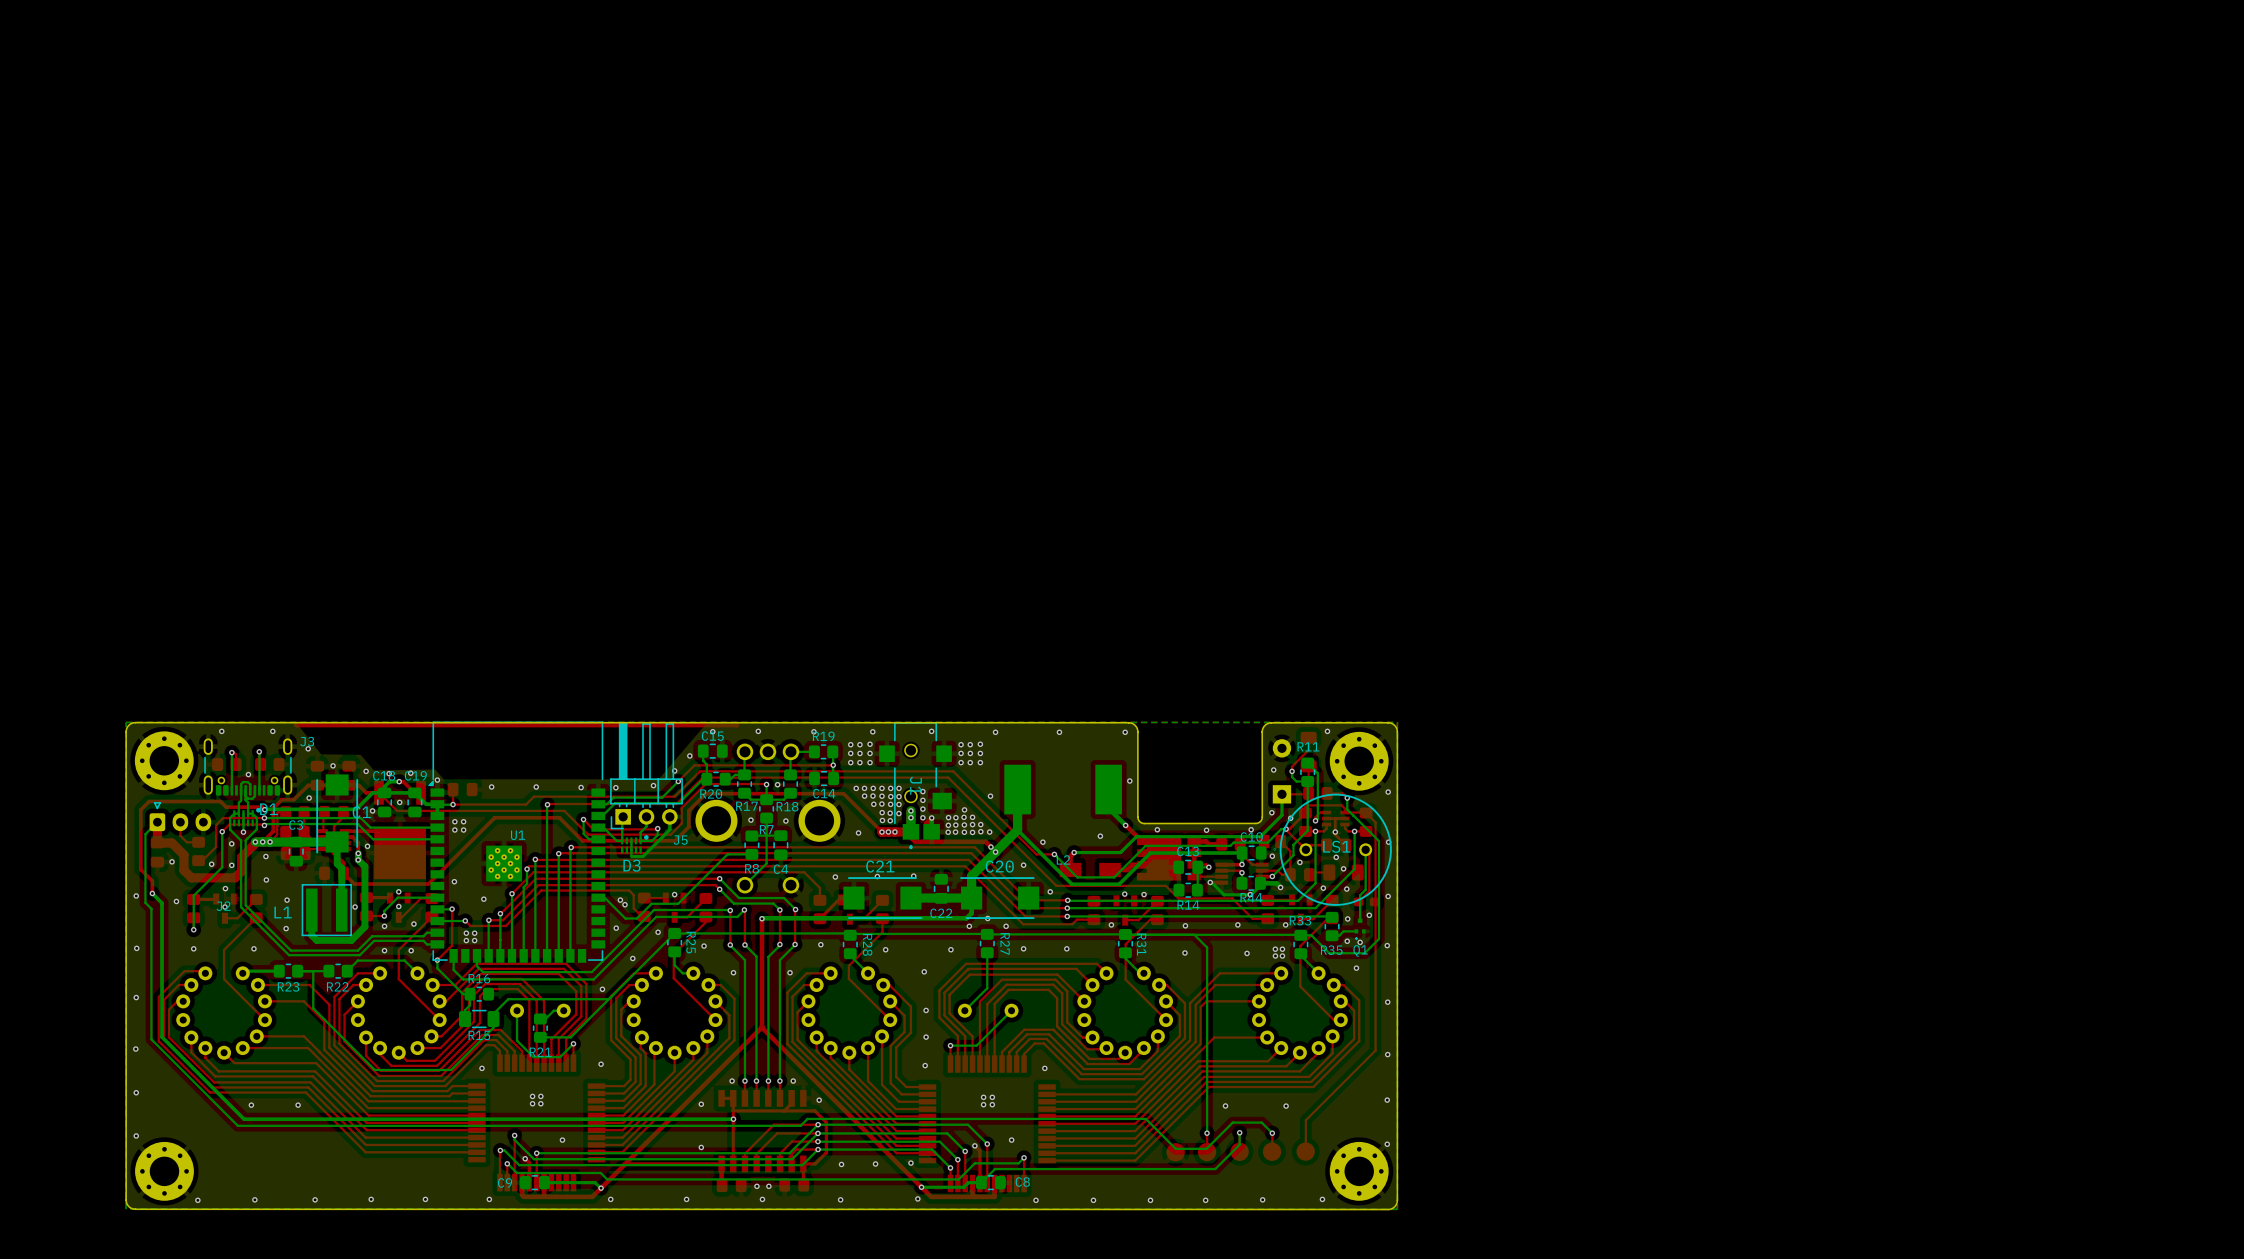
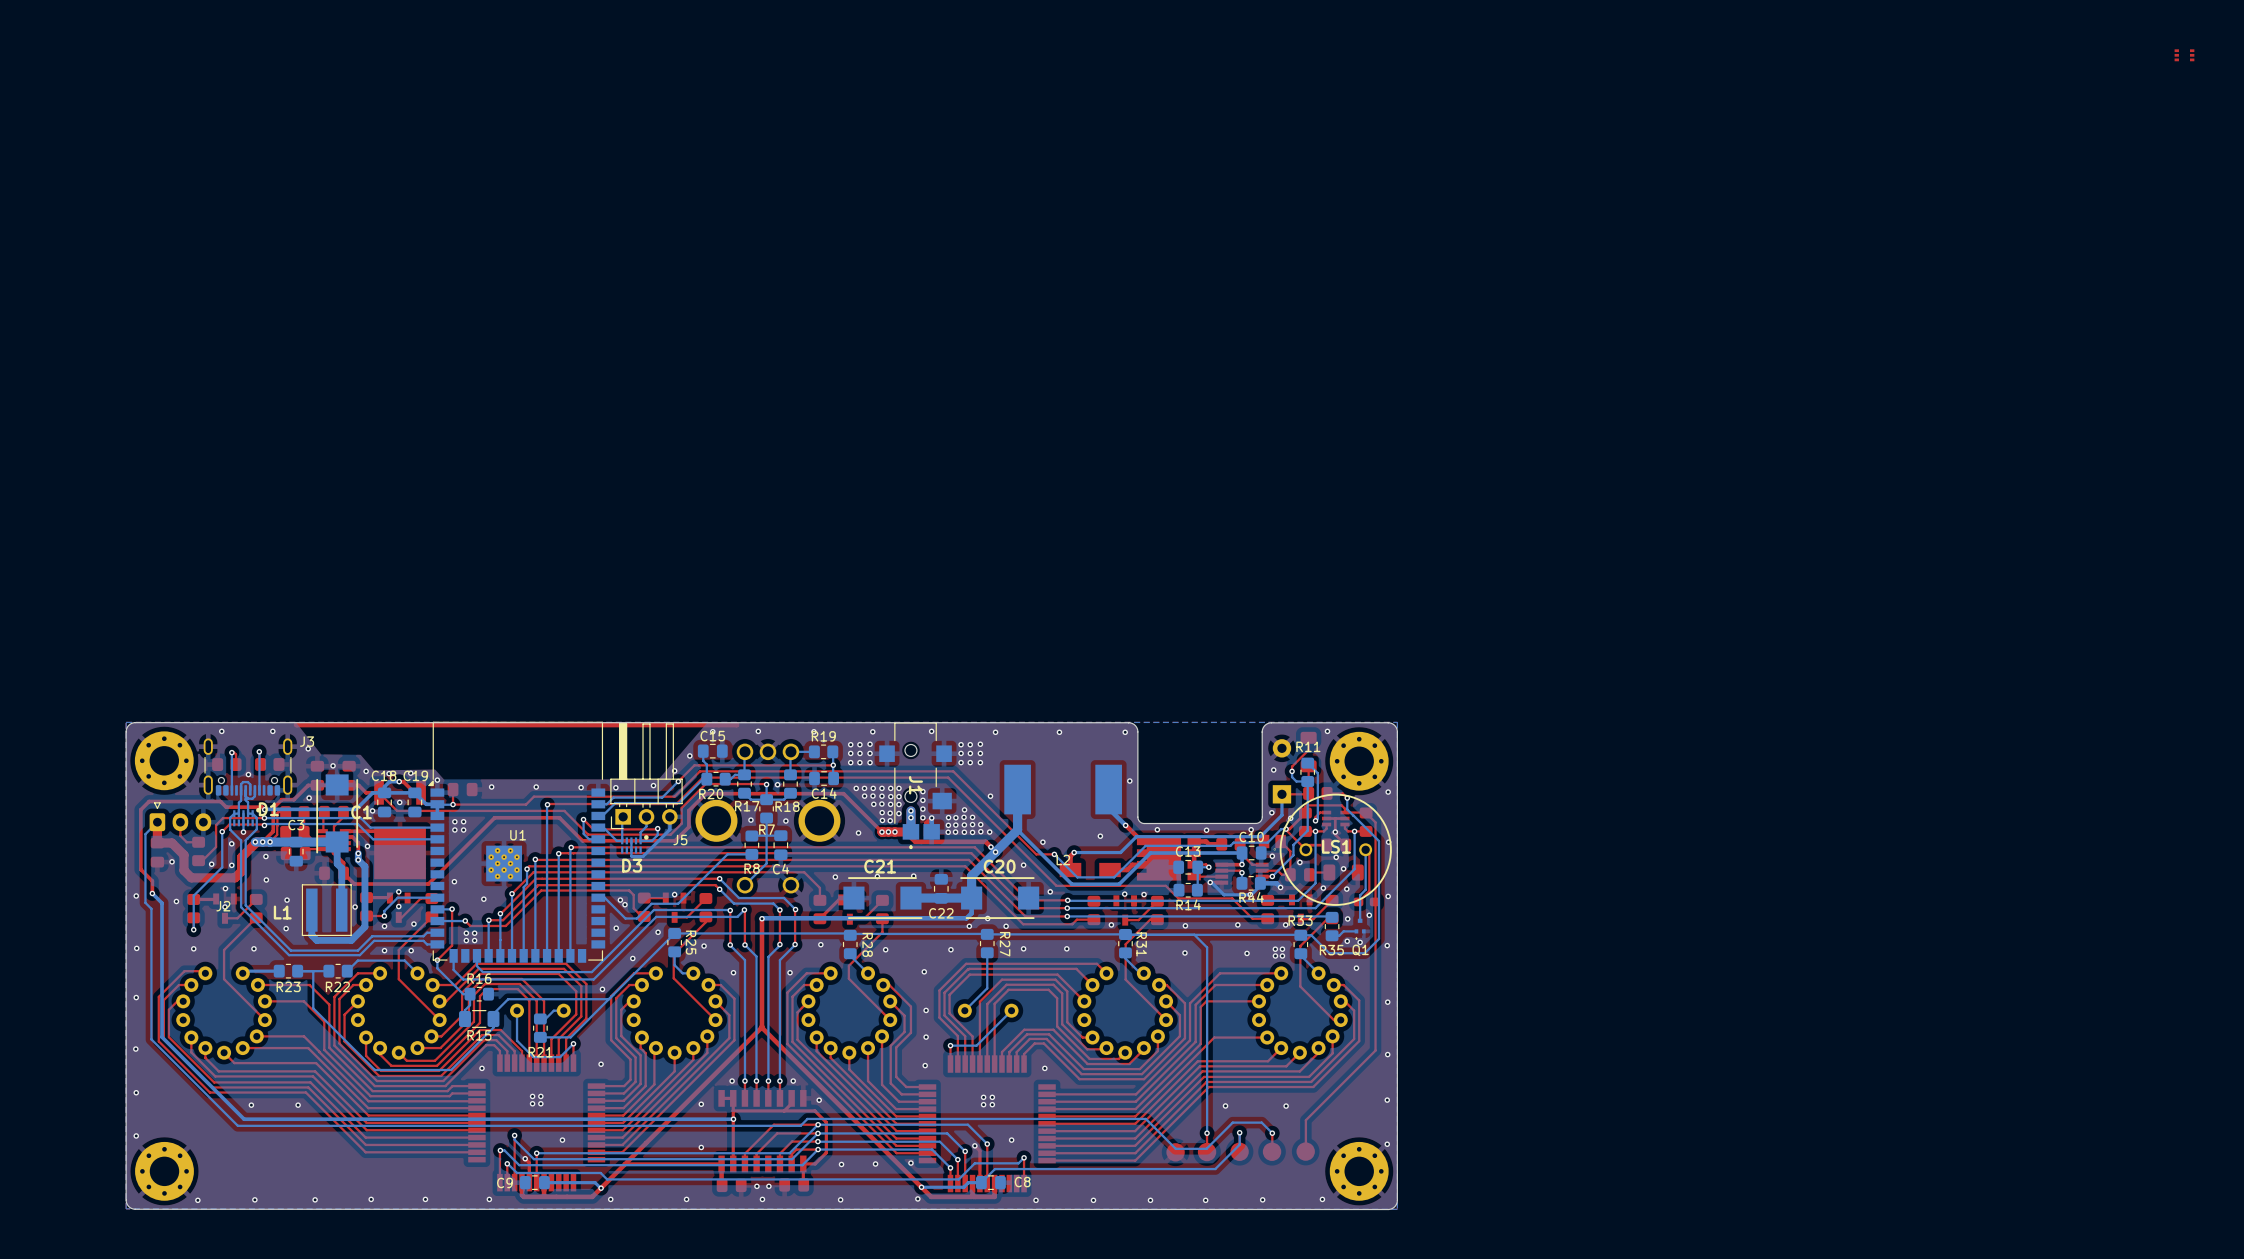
part: none -> (2184, 55)

